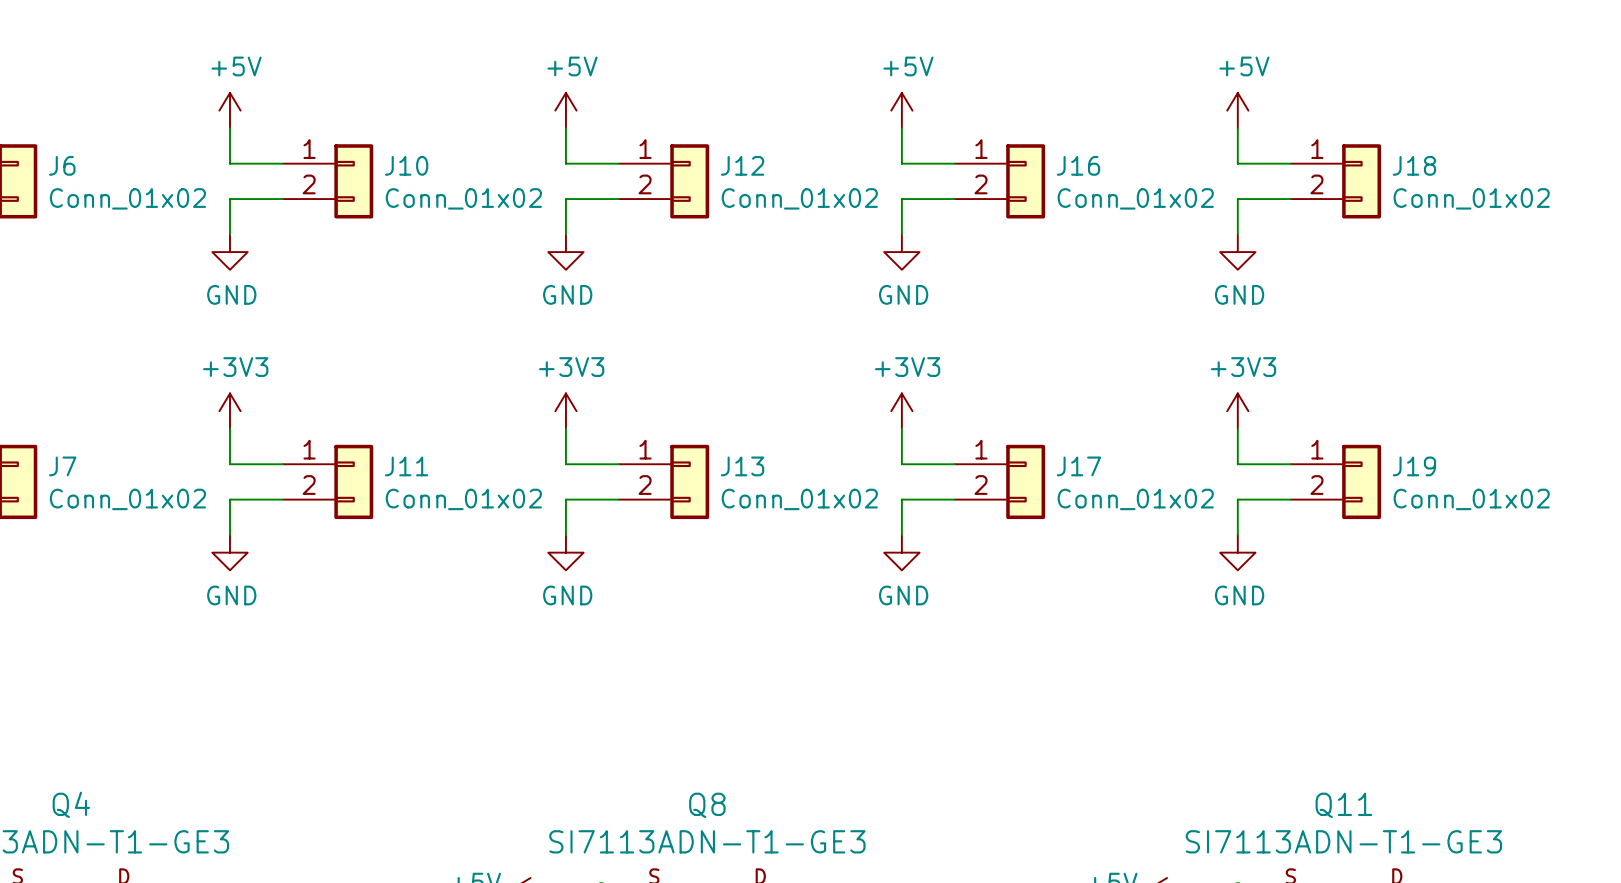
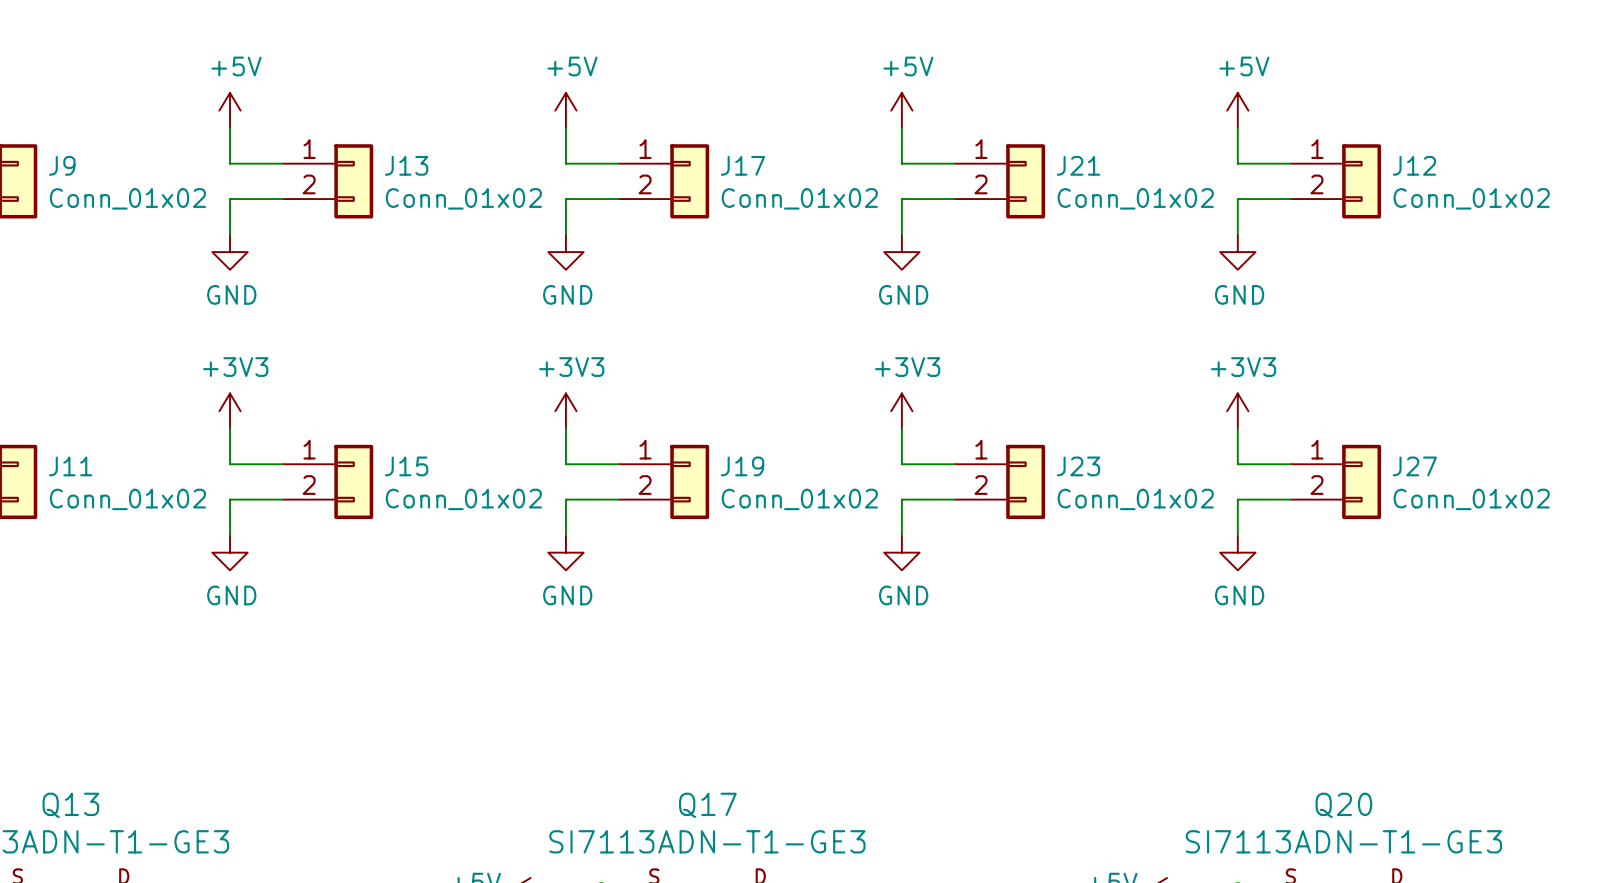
J6 name: J6 (62, 165) -> J9 (62, 165)
J10 name: J10 (406, 165) -> J13 (406, 165)
J12 name: J12 (742, 165) -> J17 (742, 165)
J16 name: J16 (1078, 165) -> J21 (1078, 165)
J18 name: J18 (1414, 165) -> J12 (1414, 165)
J7 name: J7 (62, 466) -> J11 (70, 466)
J11 name: J11 (406, 466) -> J15 (406, 466)
J13 name: J13 (742, 466) -> J19 (742, 466)
J17 name: J17 (1078, 466) -> J23 (1078, 466)
J19 name: J19 (1414, 466) -> J27 (1414, 466)
Q4 name: Q4 (71, 804) -> Q13 (70, 805)
Q8 name: Q8 (707, 805) -> Q17 (707, 805)
Q11 name: Q11 (1343, 805) -> Q20 (1343, 805)

